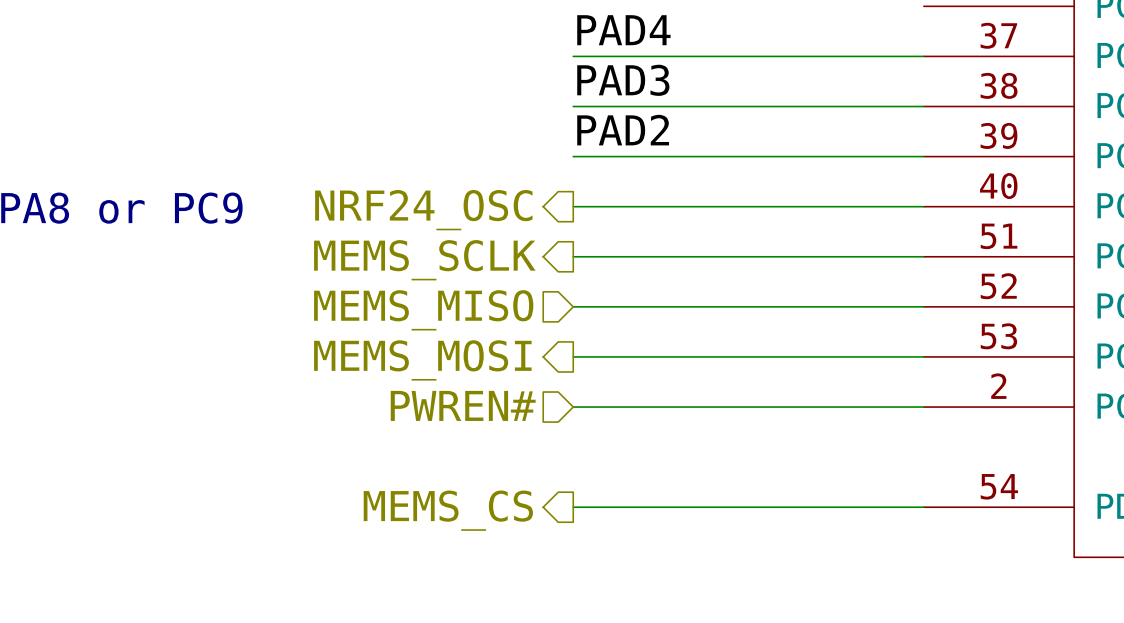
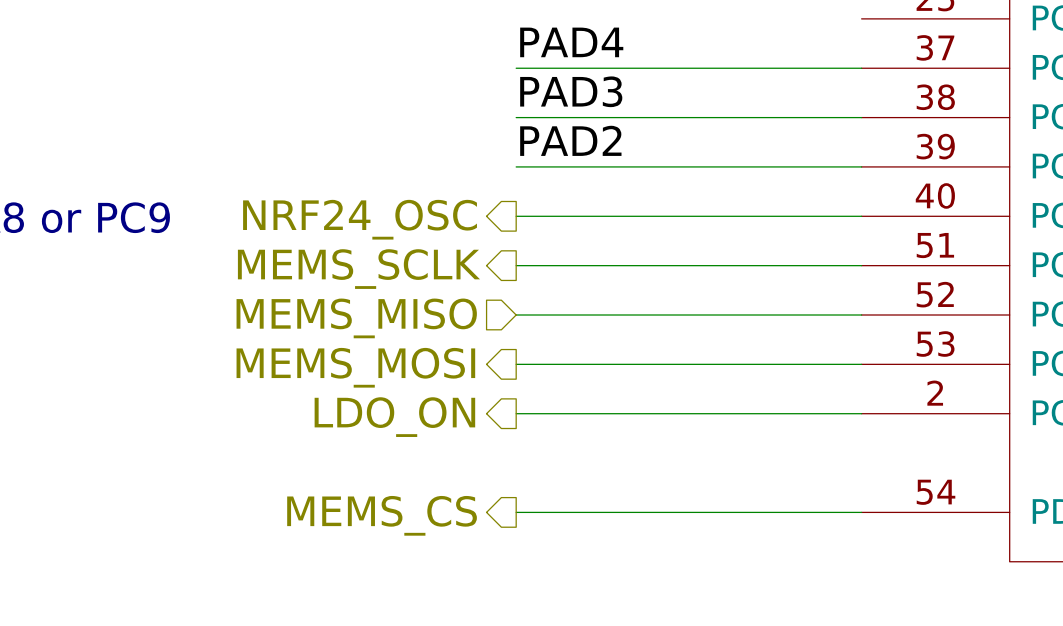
hierarchical label shape: input (463, 405) -> output (394, 417)
hierarchical label: PWREN# (463, 405) -> LDO_ON (394, 417)

